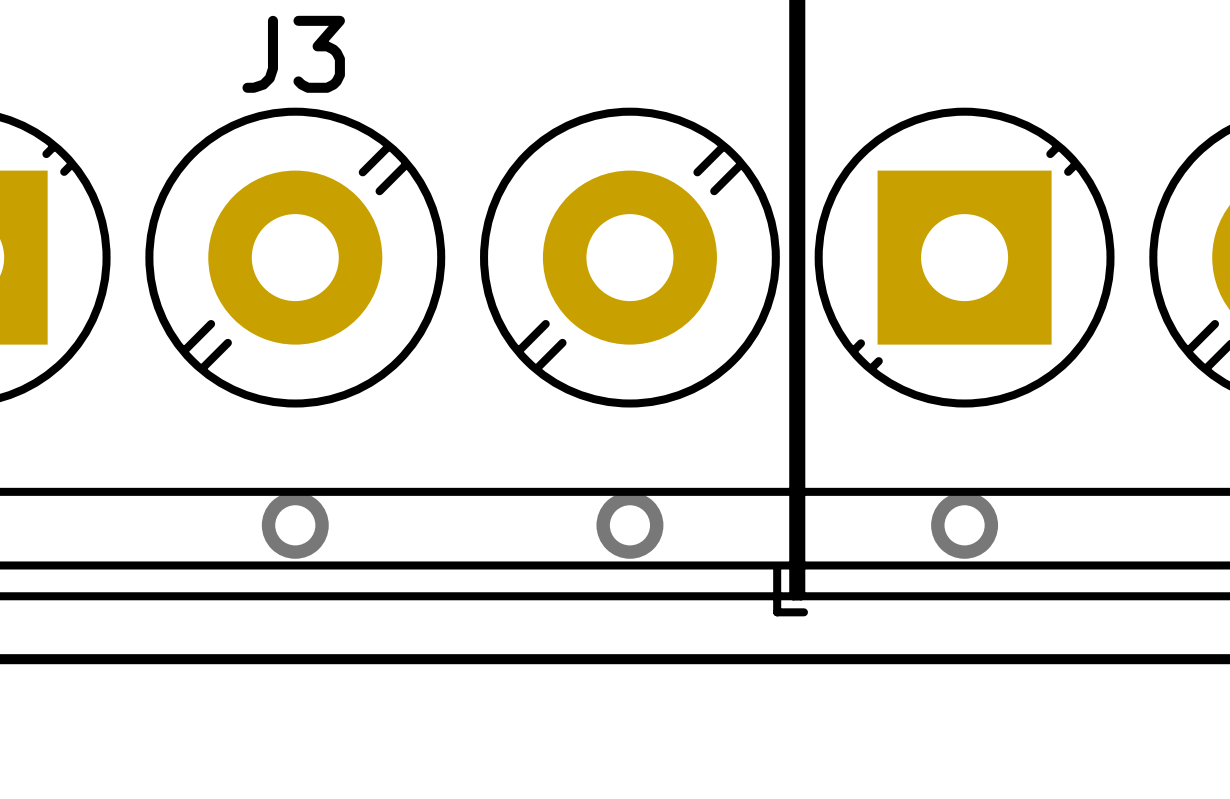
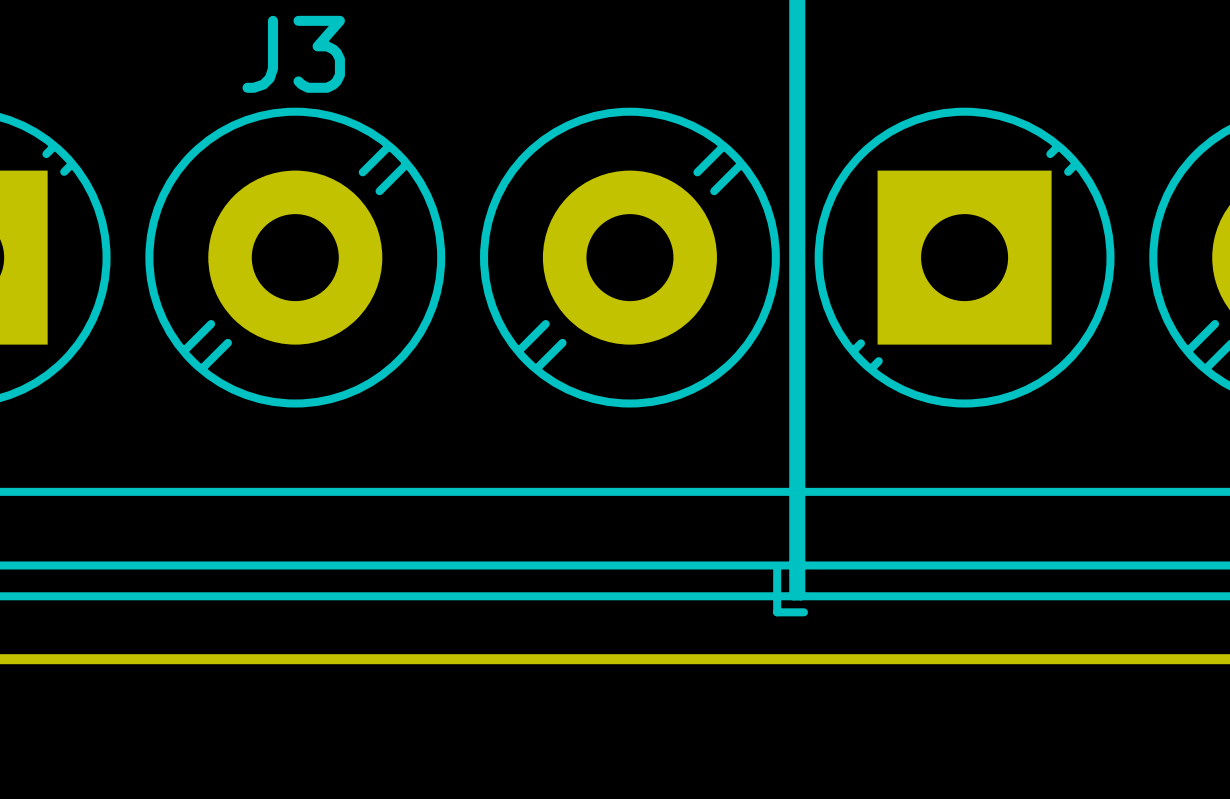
via: (295, 525) -> none
via: (629, 525) -> none
via: (964, 525) -> none

